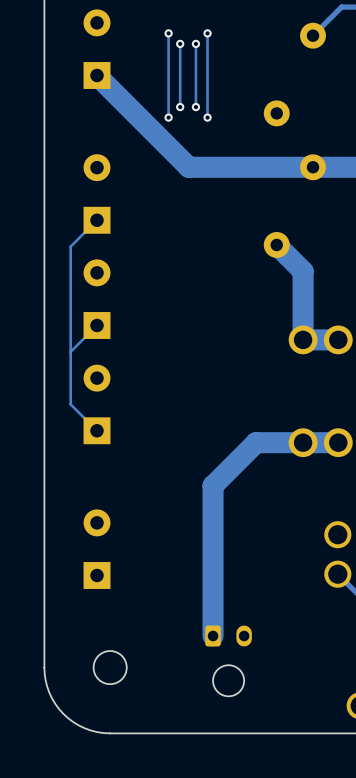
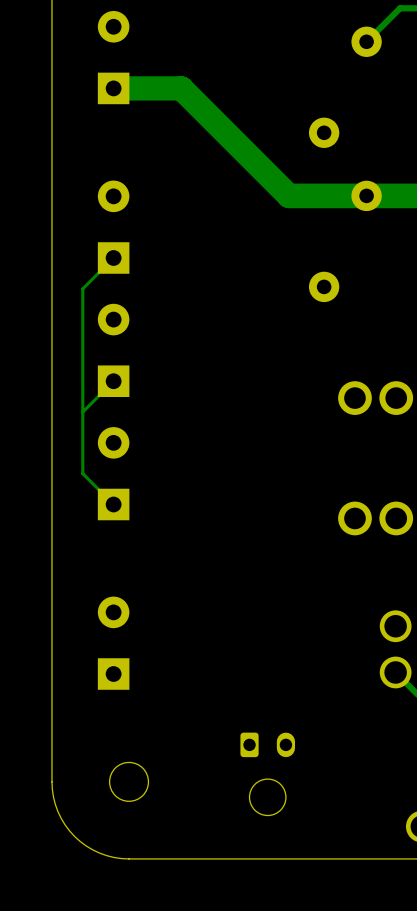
track: (168, 33) (168, 117) -> none
via: (168, 33) -> none
track: (207, 33) (207, 117) -> none
via: (207, 33) -> none
track: (180, 43) (180, 107) -> none
via: (180, 43) -> none
track: (195, 43) (195, 107) -> none
via: (195, 43) -> none
track: (97, 75) (188, 167) (246, 167) -> (113, 88) (181, 88) (288, 195)
via: (180, 107) -> none
via: (195, 107) -> none
via: (168, 117) -> none
via: (207, 117) -> none
track: (276, 244) (303, 271) (303, 339) (338, 339) -> none
track: (338, 442) (256, 442) (213, 485) (213, 636) -> none

